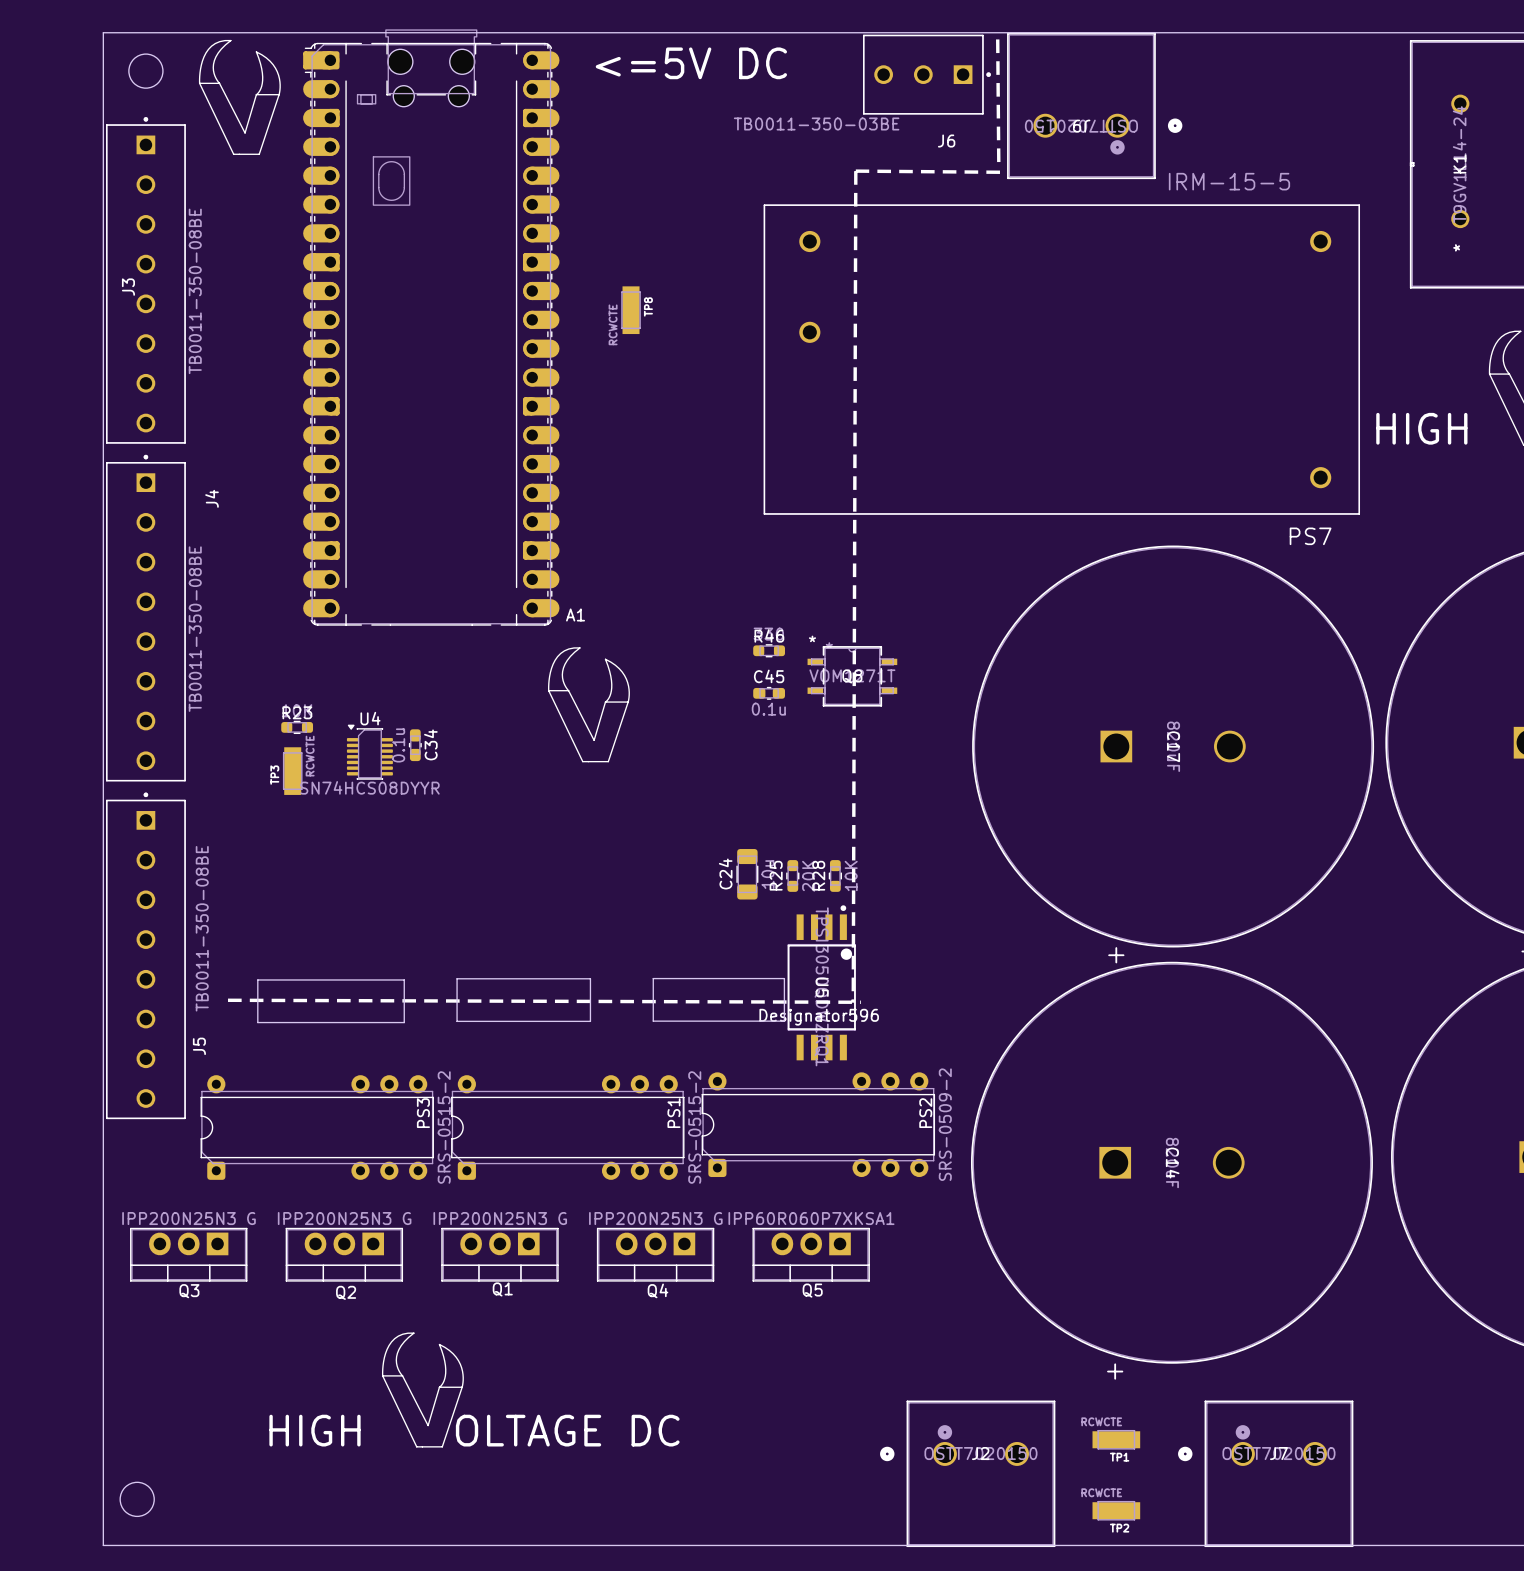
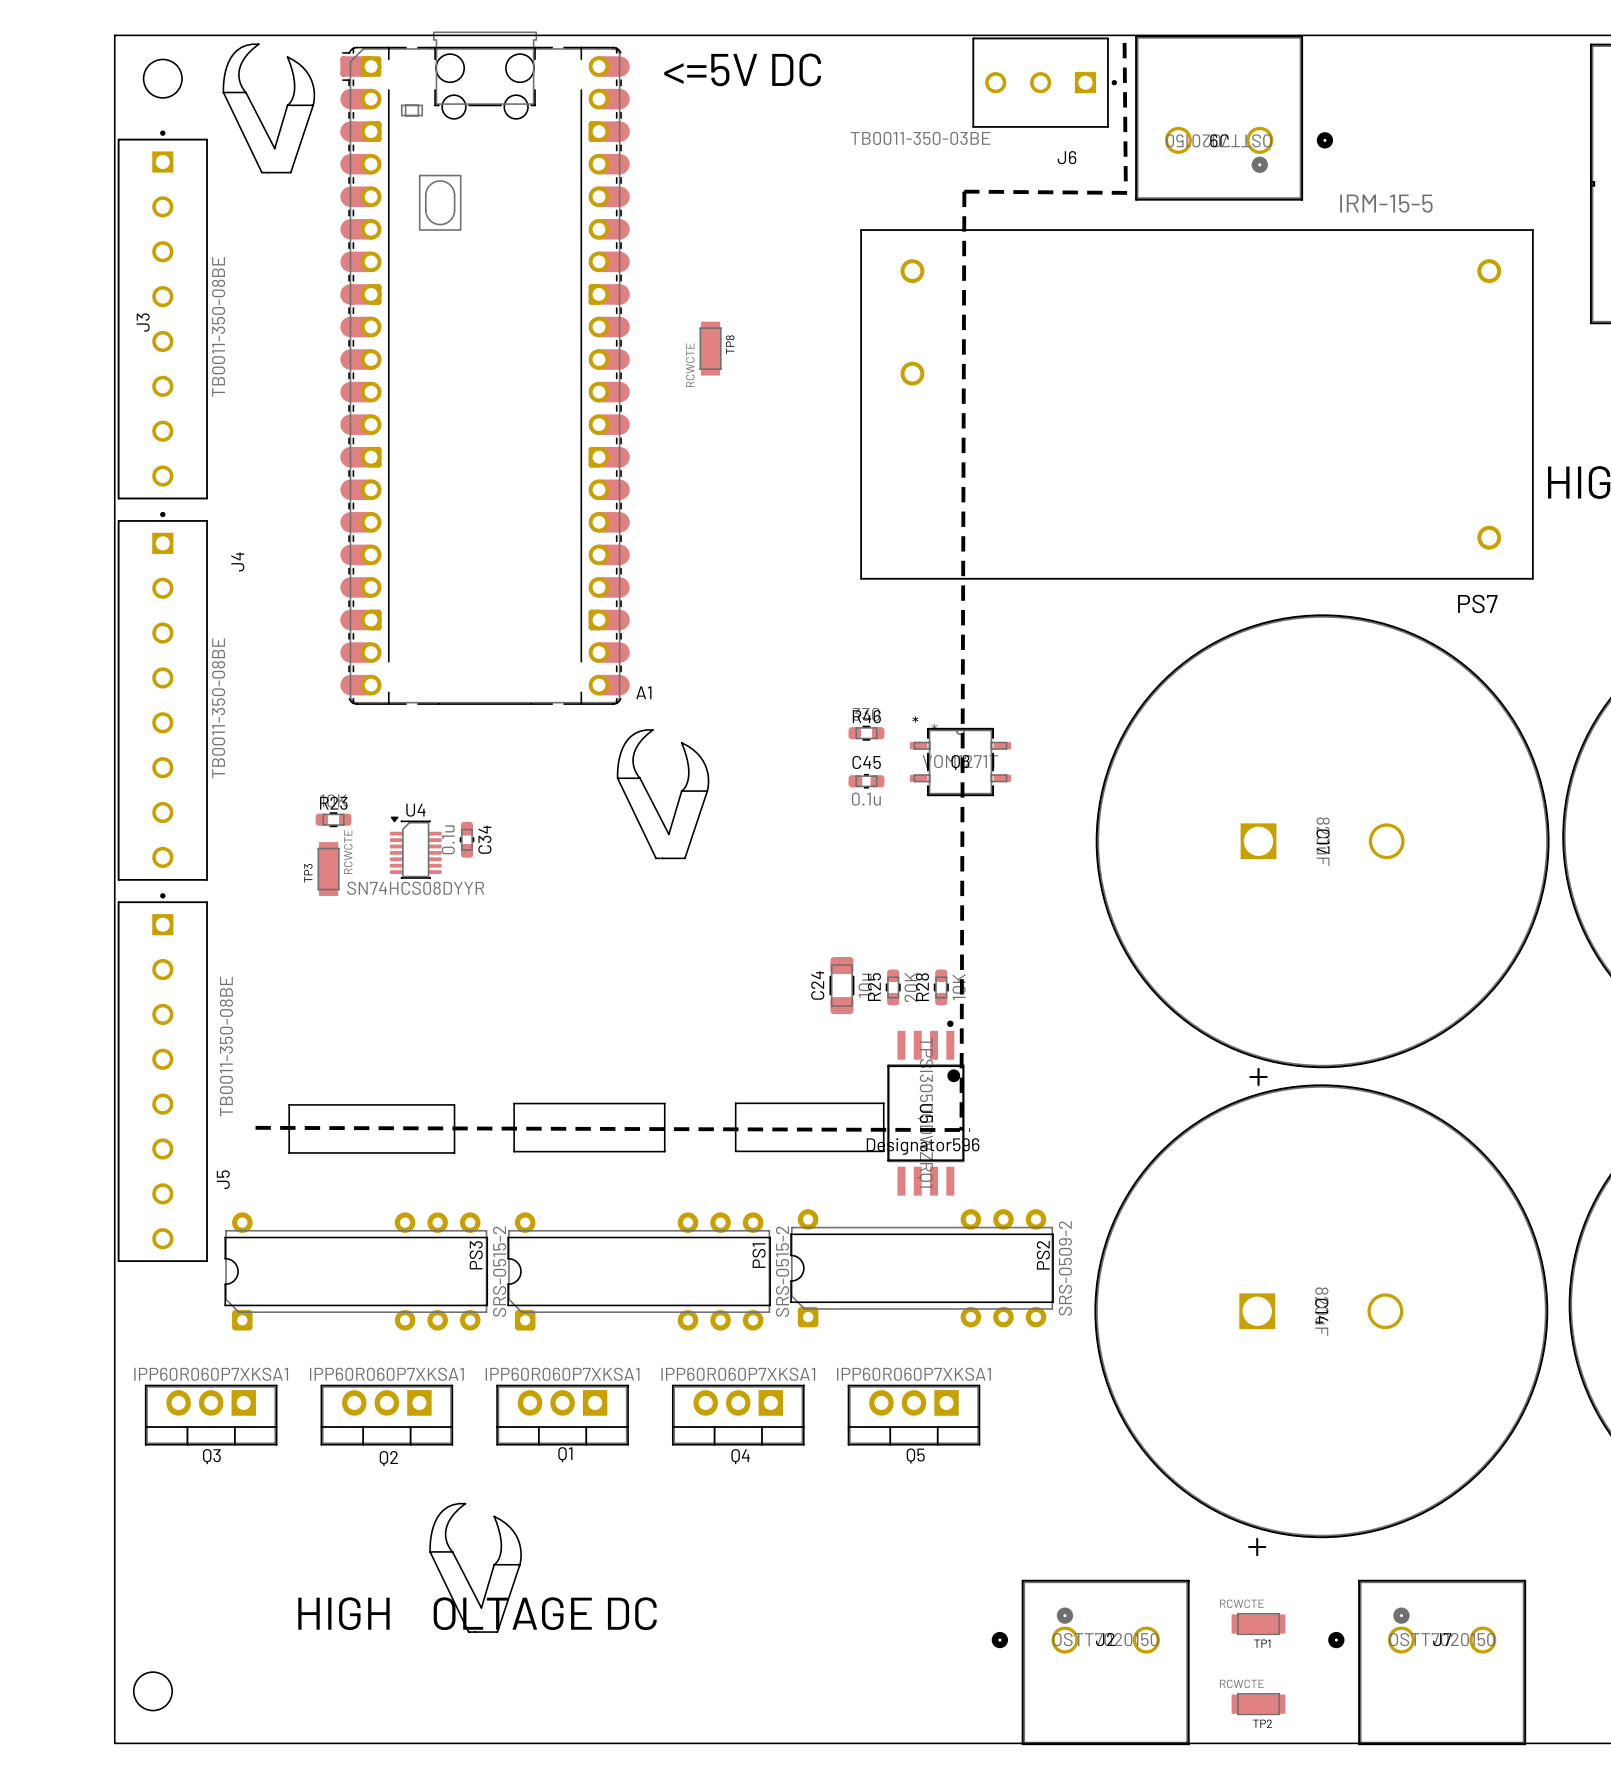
Q3 value: IPP200N25N3 G (189, 1218) -> IPP60R060P7XKSA1 (211, 1374)
Q2 value: IPP200N25N3 G (344, 1218) -> IPP60R060P7XKSA1 (386, 1374)
Q1 value: IPP200N25N3 G (500, 1218) -> IPP60R060P7XKSA1 (562, 1374)
Q4 value: IPP200N25N3 G (655, 1218) -> IPP60R060P7XKSA1 (738, 1374)

